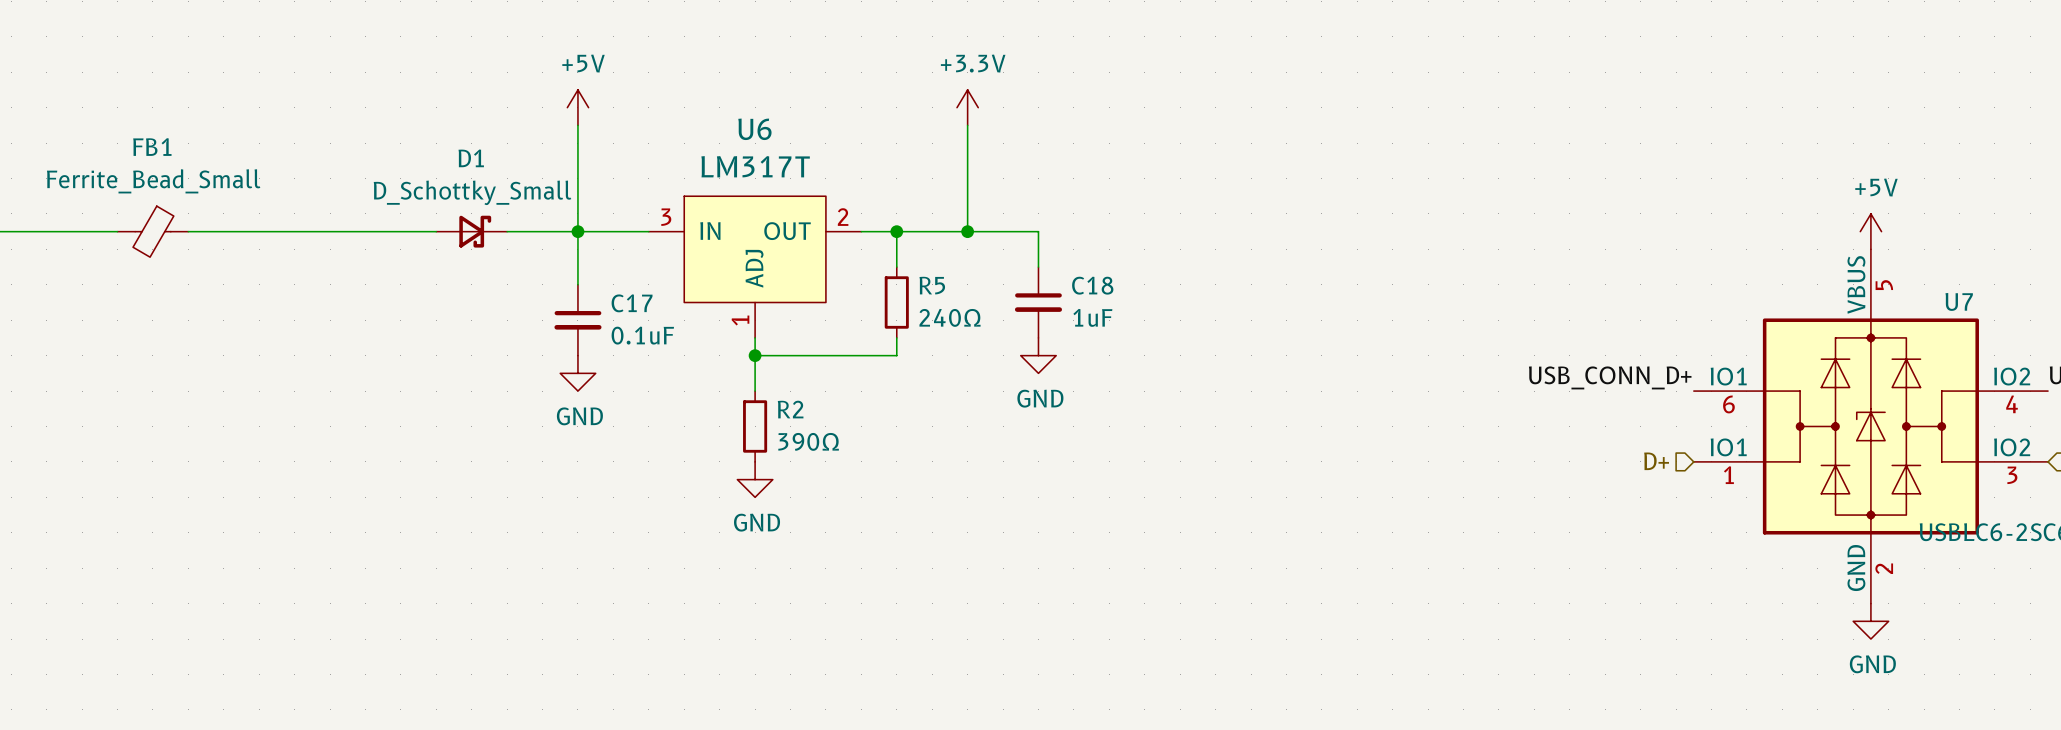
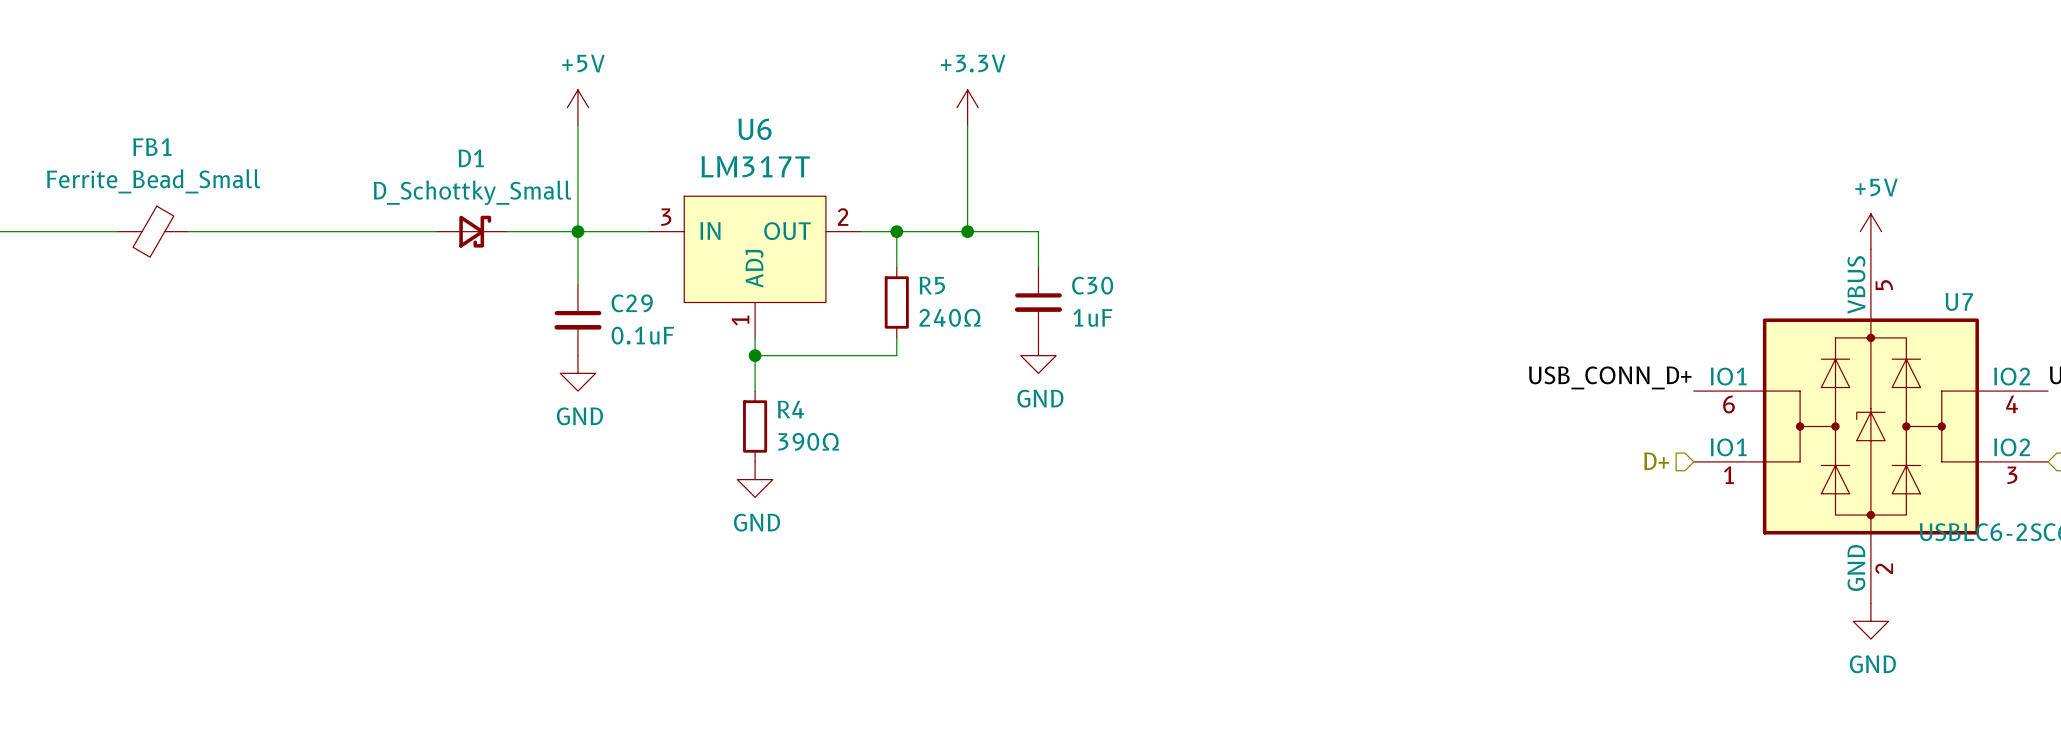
C18 name: C18 (1092, 285) -> C30 (1092, 285)
C17 name: C17 (632, 303) -> C29 (632, 303)
R2 name: R2 (790, 409) -> R4 (790, 409)

